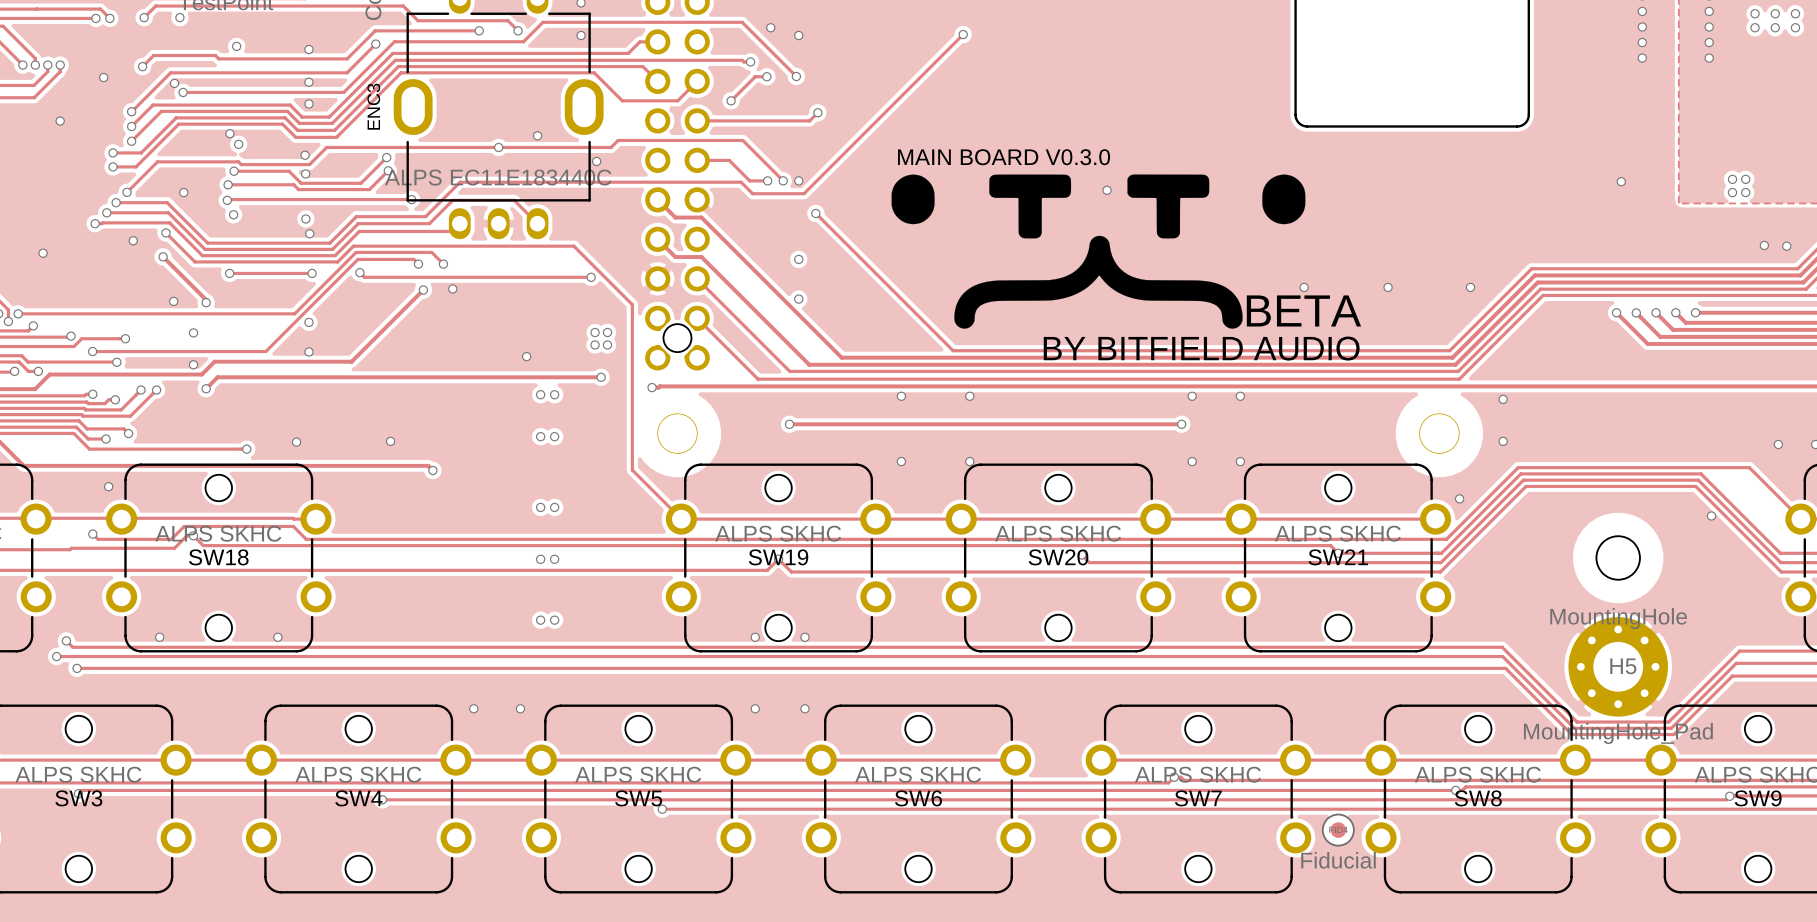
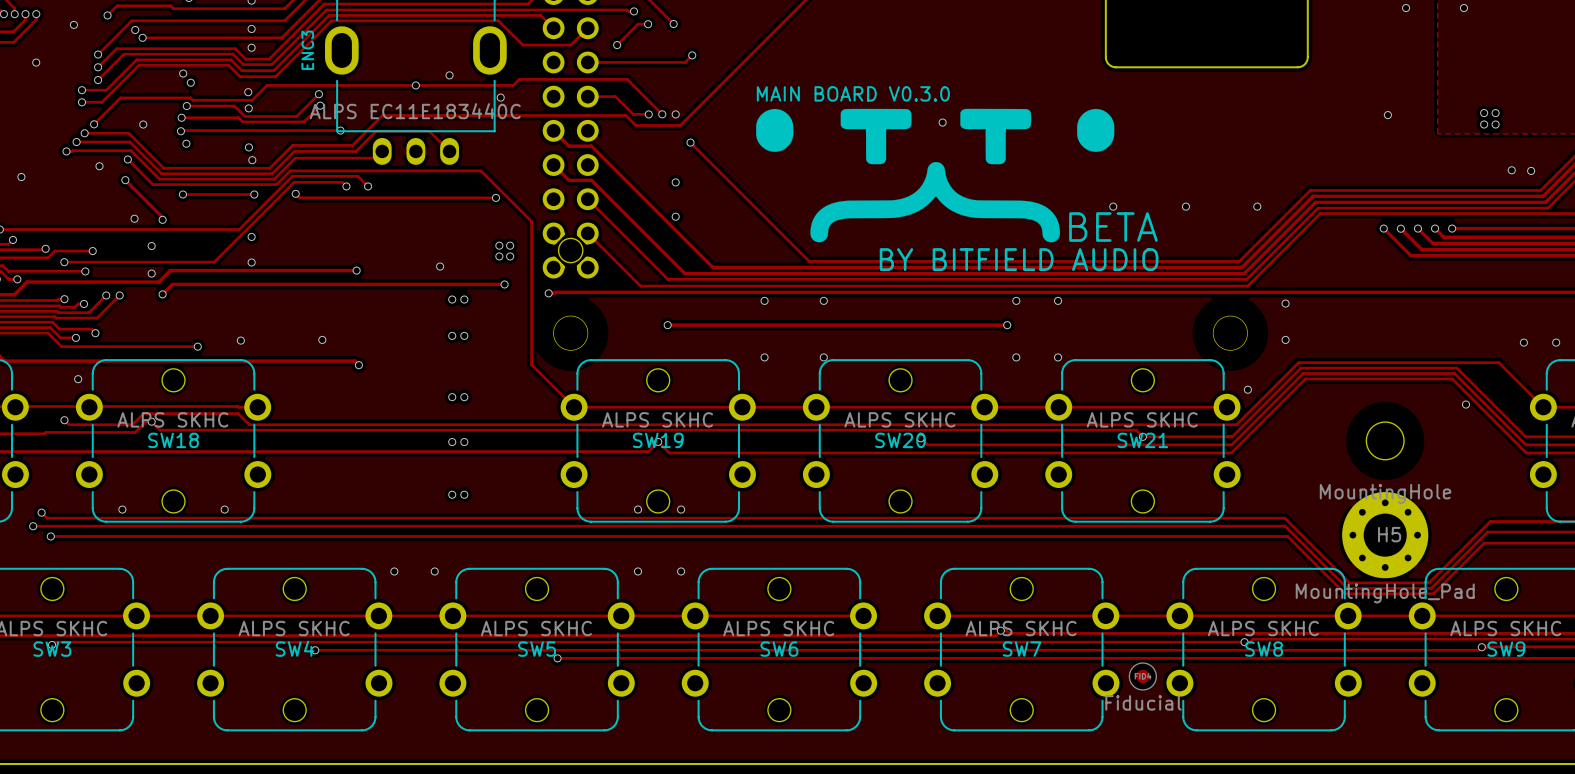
via: (452, 288) -> none
track: (423, 290) (351, 361) (214, 361) -> (356, 270) (169, 270)
via: (423, 290) -> none
via: none -> (356, 270)

